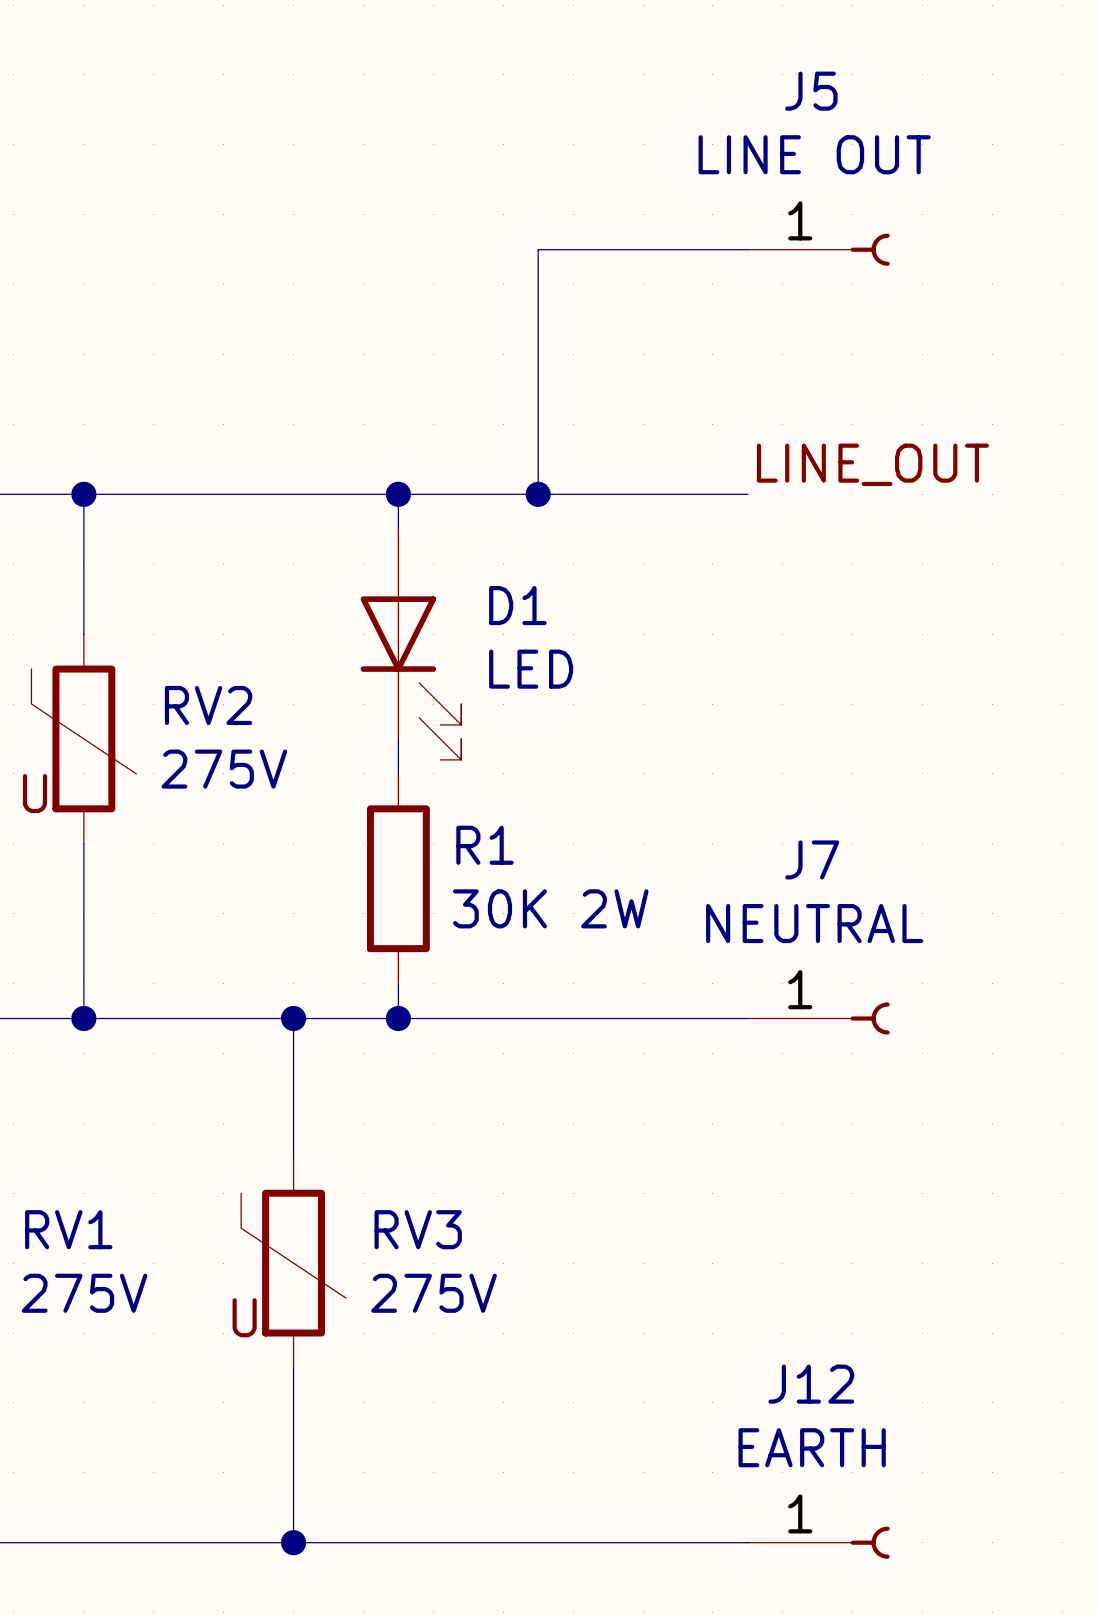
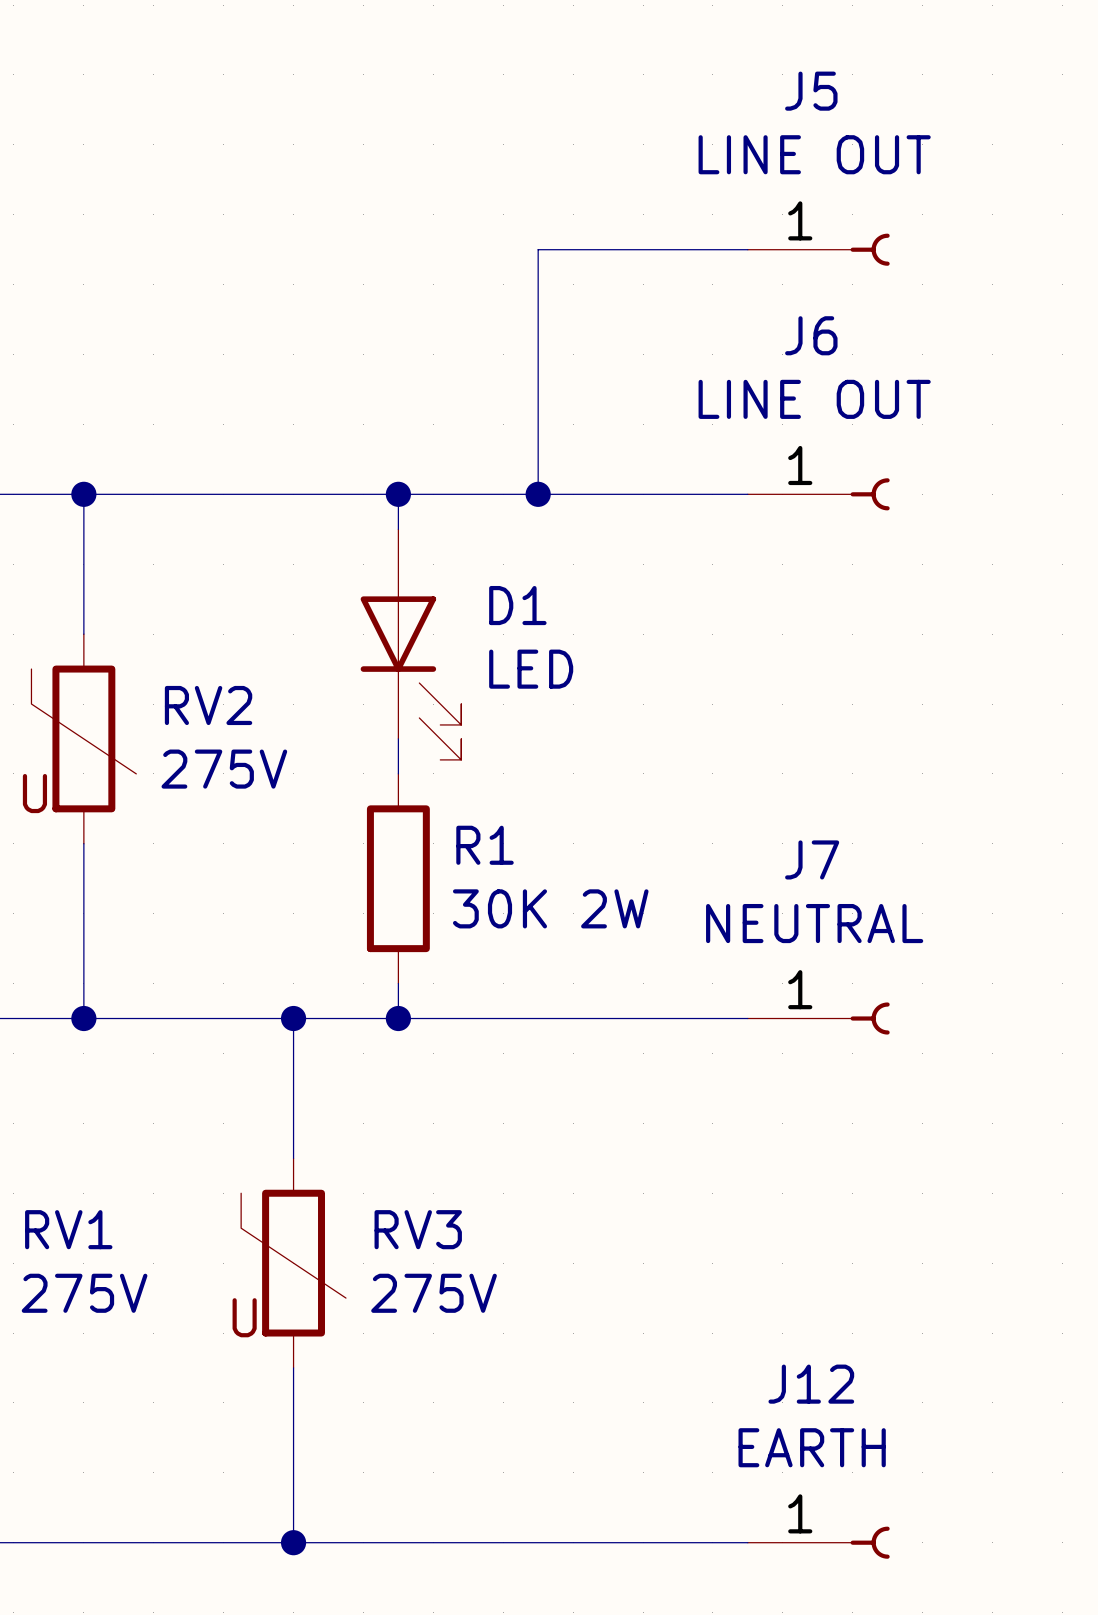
label: LINE_OUT (872, 464) -> none
J6: none -> LINE OUT (818, 494)

